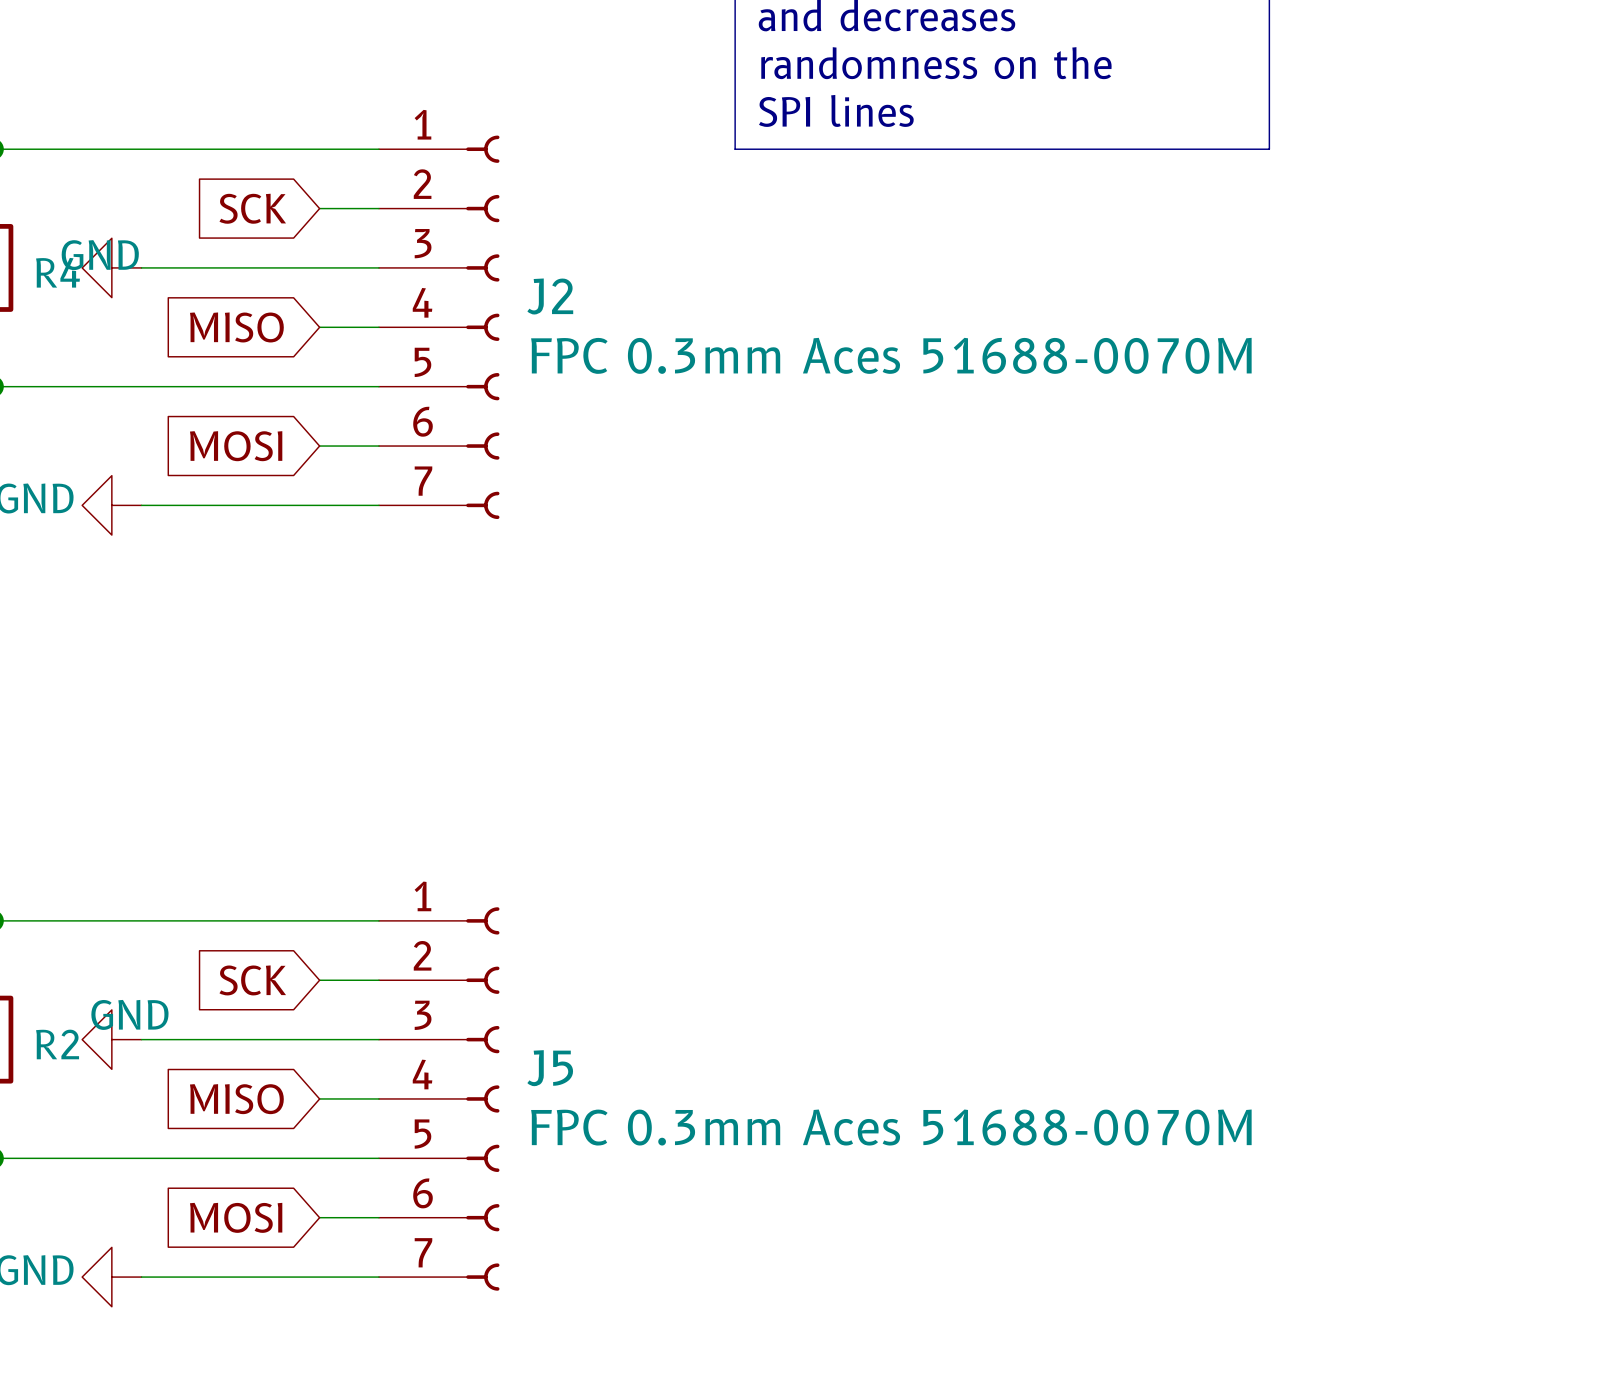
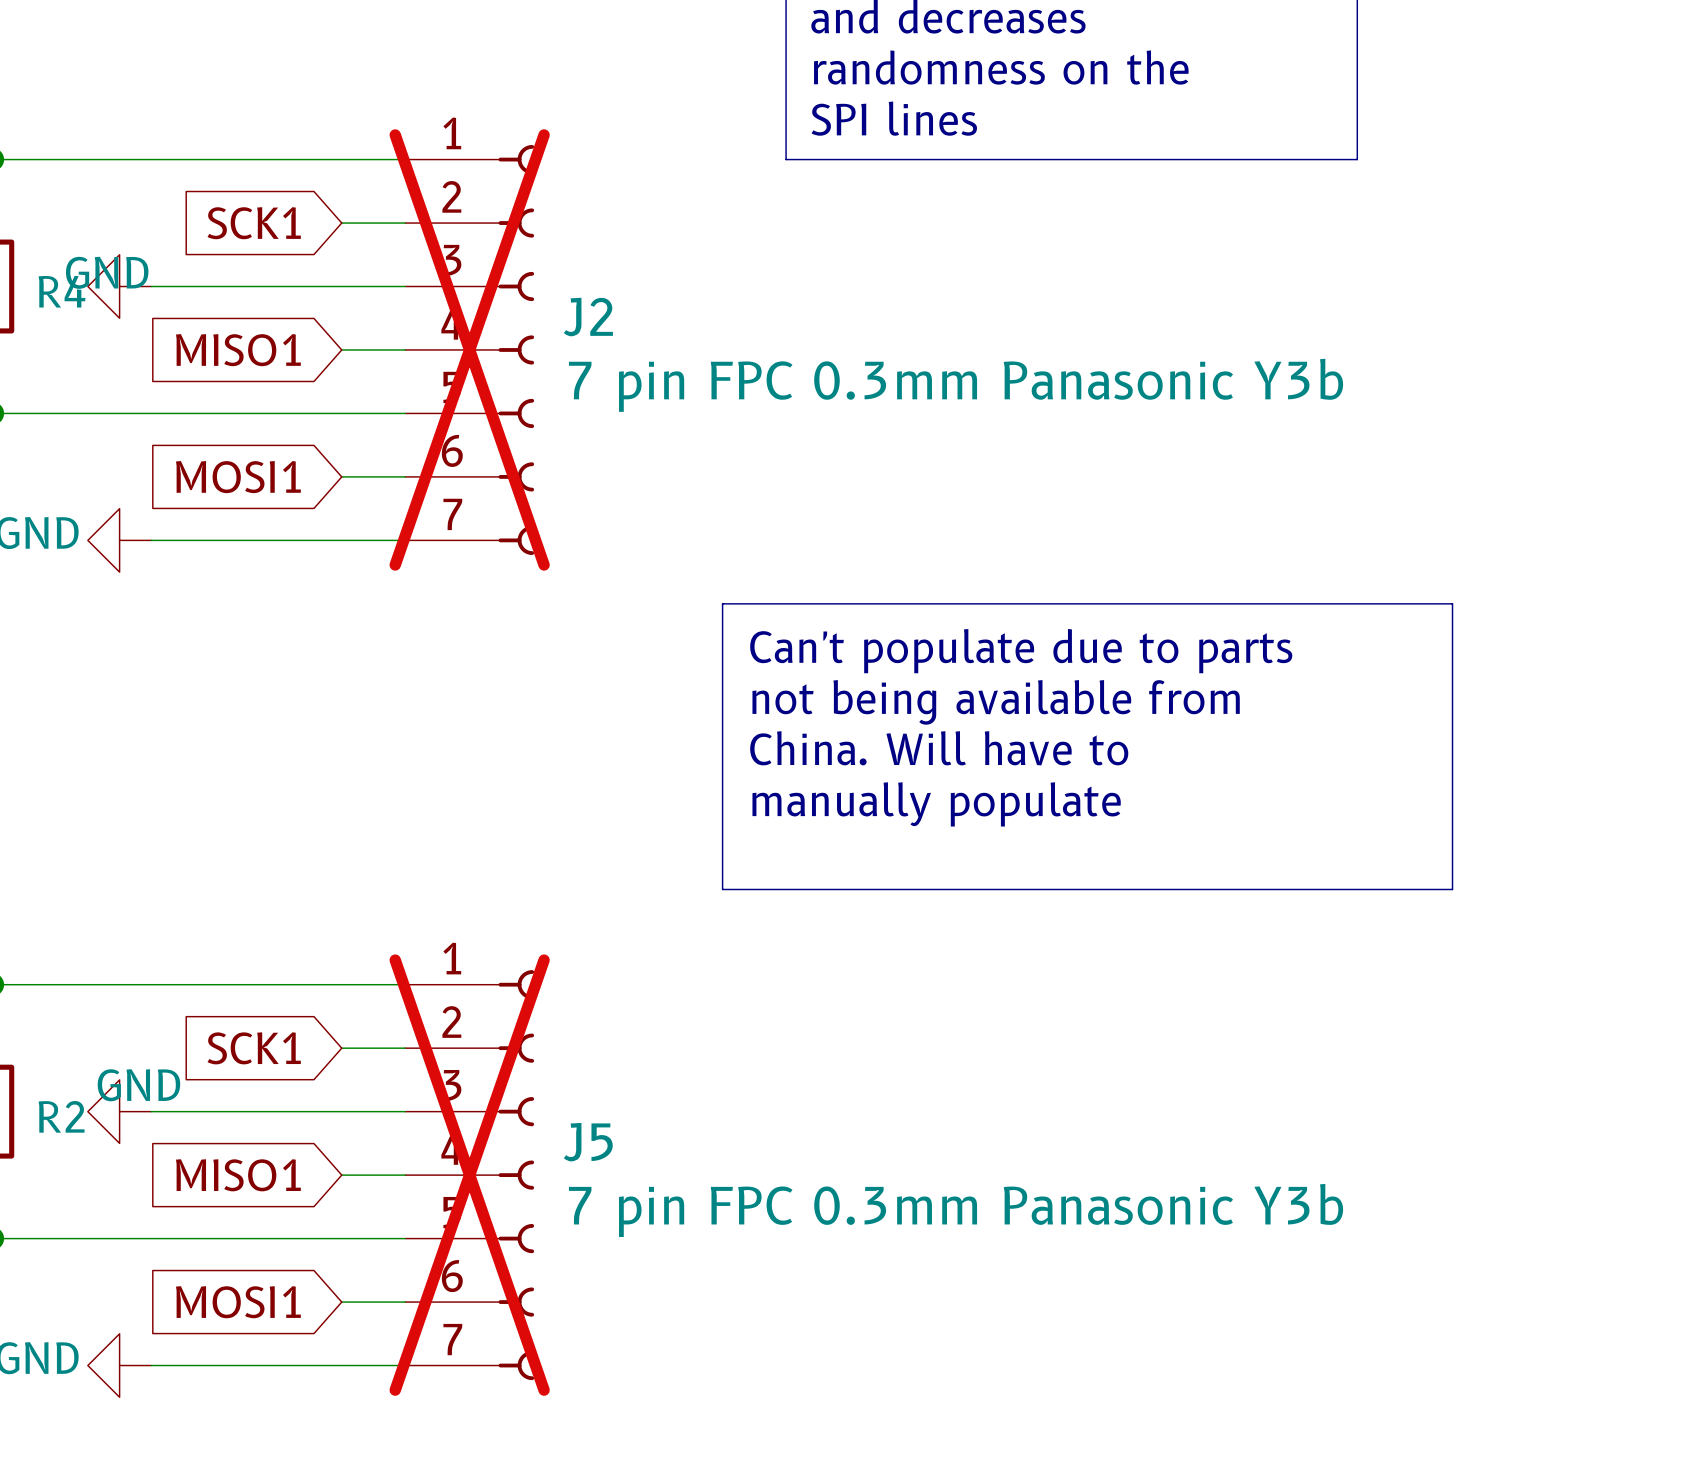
global label: SCK (252, 208) -> SCK1 (254, 223)
global label: MISO (236, 327) -> MISO1 (238, 350)
J2 do-not-place cross: none -> (469, 349)
J2 value: FPC 0.3mm Aces 51688-0070M (891, 355) -> 7 pin FPC 0.3mm Panasonic Y3b (956, 385)
global label: MOSI (236, 446) -> MOSI1 (238, 477)
line: none -> (722, 603) (1452, 603) (1452, 889) (722, 889) (722, 603)
text: none -> Can't populate due to parts (1021, 651)
text: none -> not being available from (996, 702)
text: none -> China. Will have to (939, 748)
text: none -> manually populate (936, 804)
global label: SCK (252, 980) -> SCK1 (254, 1048)
J5 do-not-place cross: none -> (469, 1175)
global label: MISO (236, 1099) -> MISO1 (238, 1175)
J5 value: FPC 0.3mm Aces 51688-0070M (891, 1127) -> 7 pin FPC 0.3mm Panasonic Y3b (956, 1210)
global label: MOSI (236, 1217) -> MOSI1 (238, 1302)

